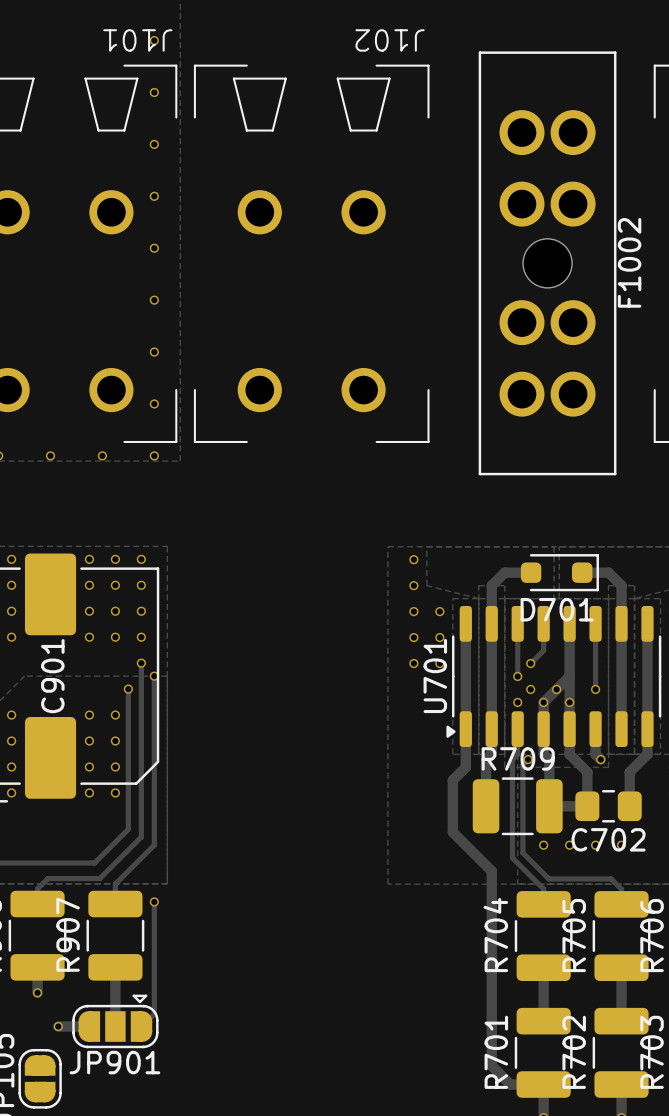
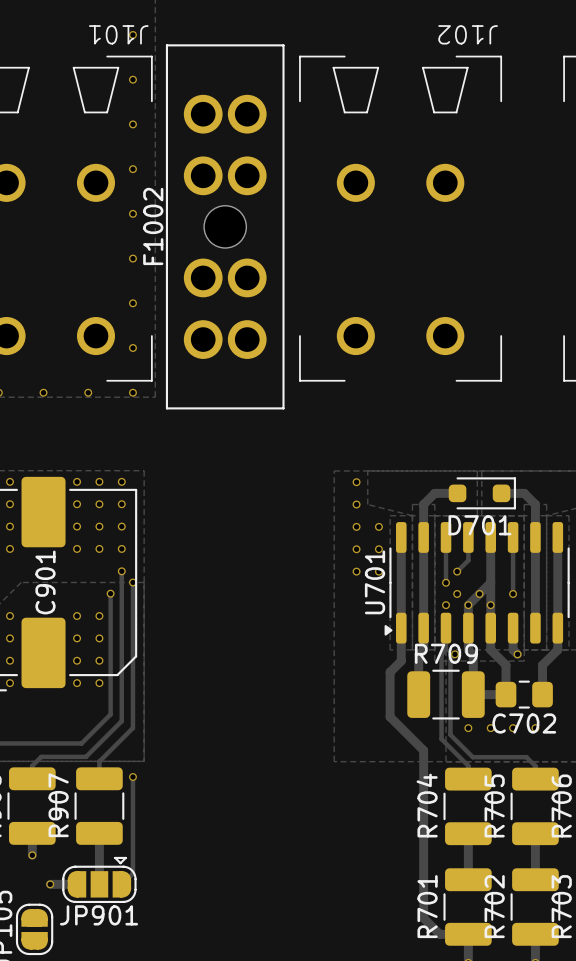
J102 position: (311, 253) -> (400, 218)
F1002 name position: F1002 (629, 262) -> F1002 (153, 226)
F1002 position: (547, 263) -> (225, 226)

